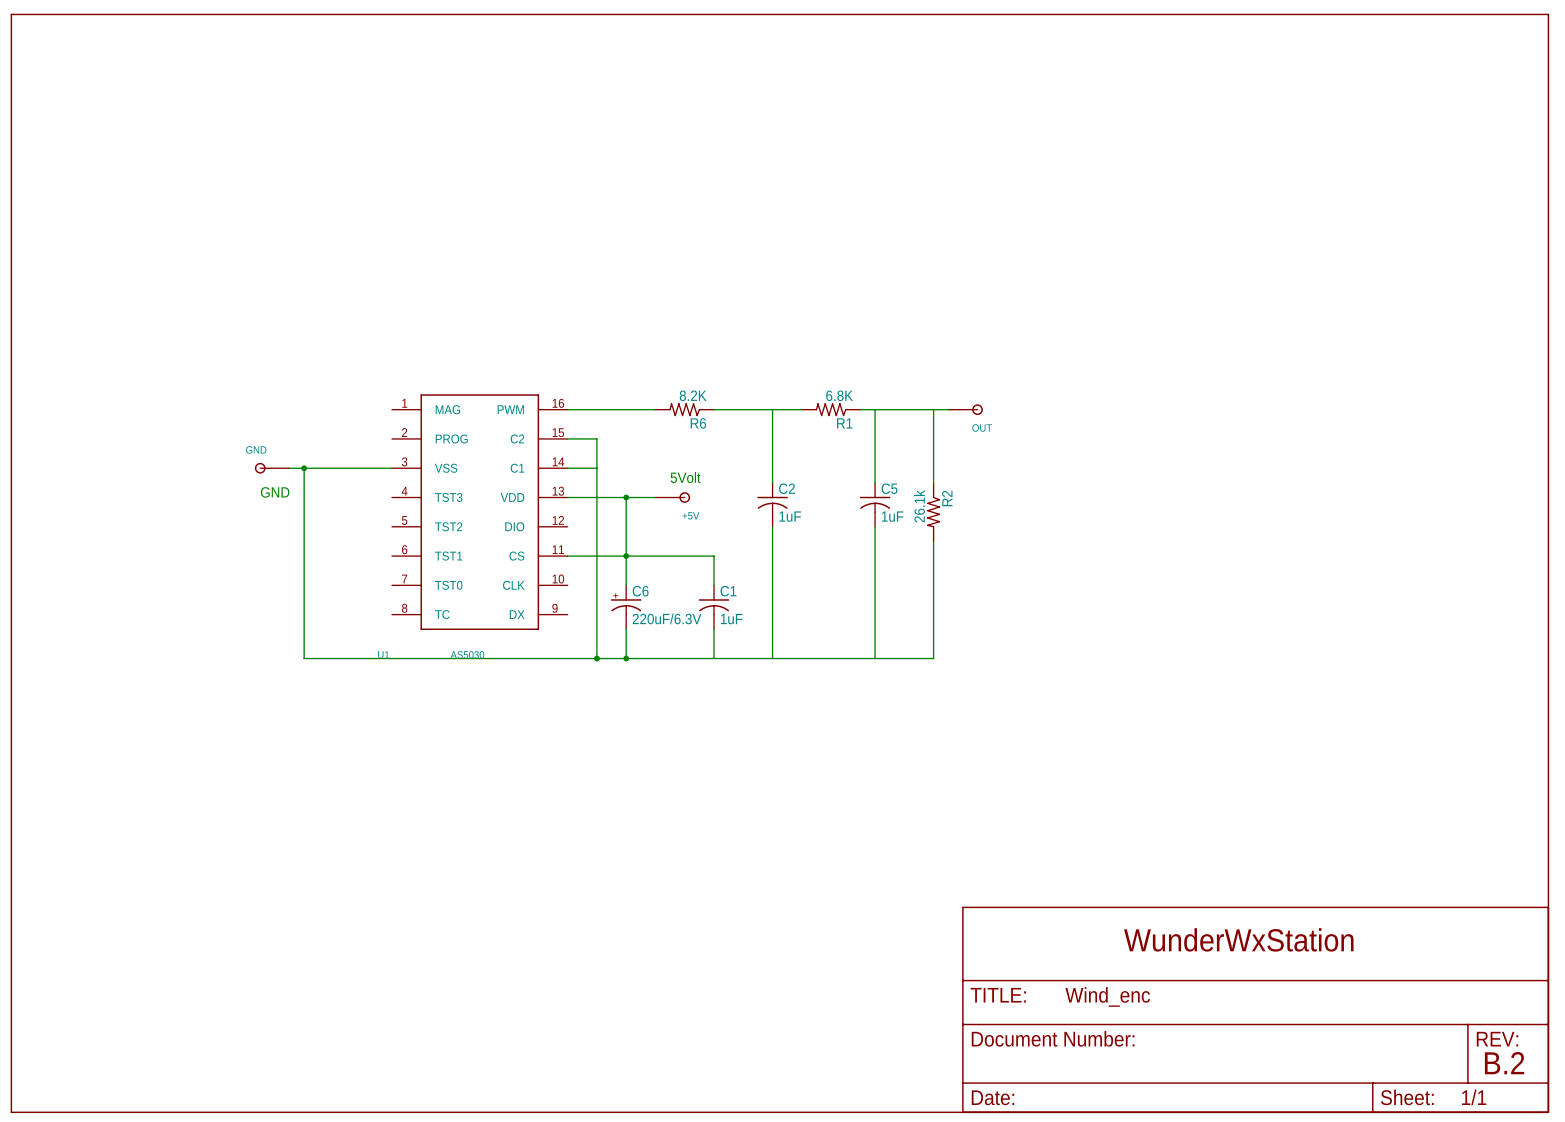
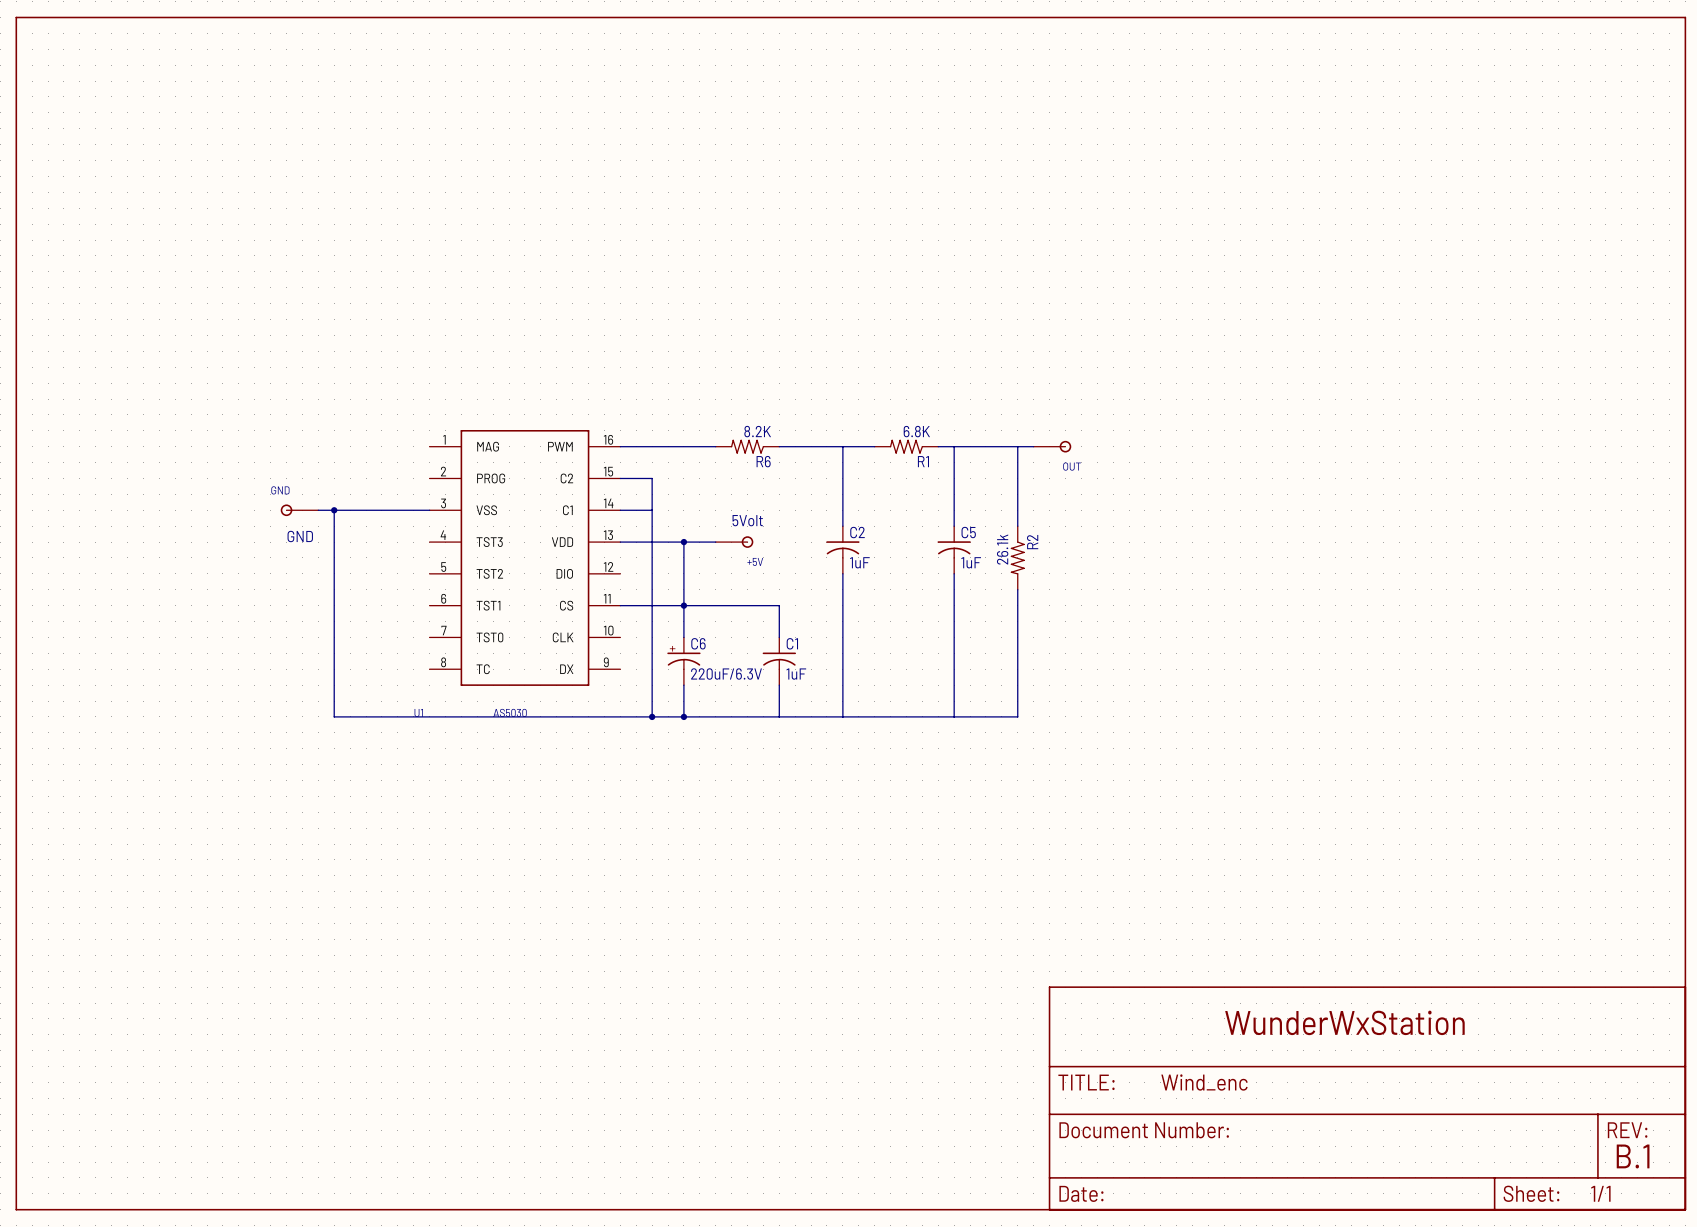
text: B.2 (1504, 1063) -> B.1 (1633, 1156)

